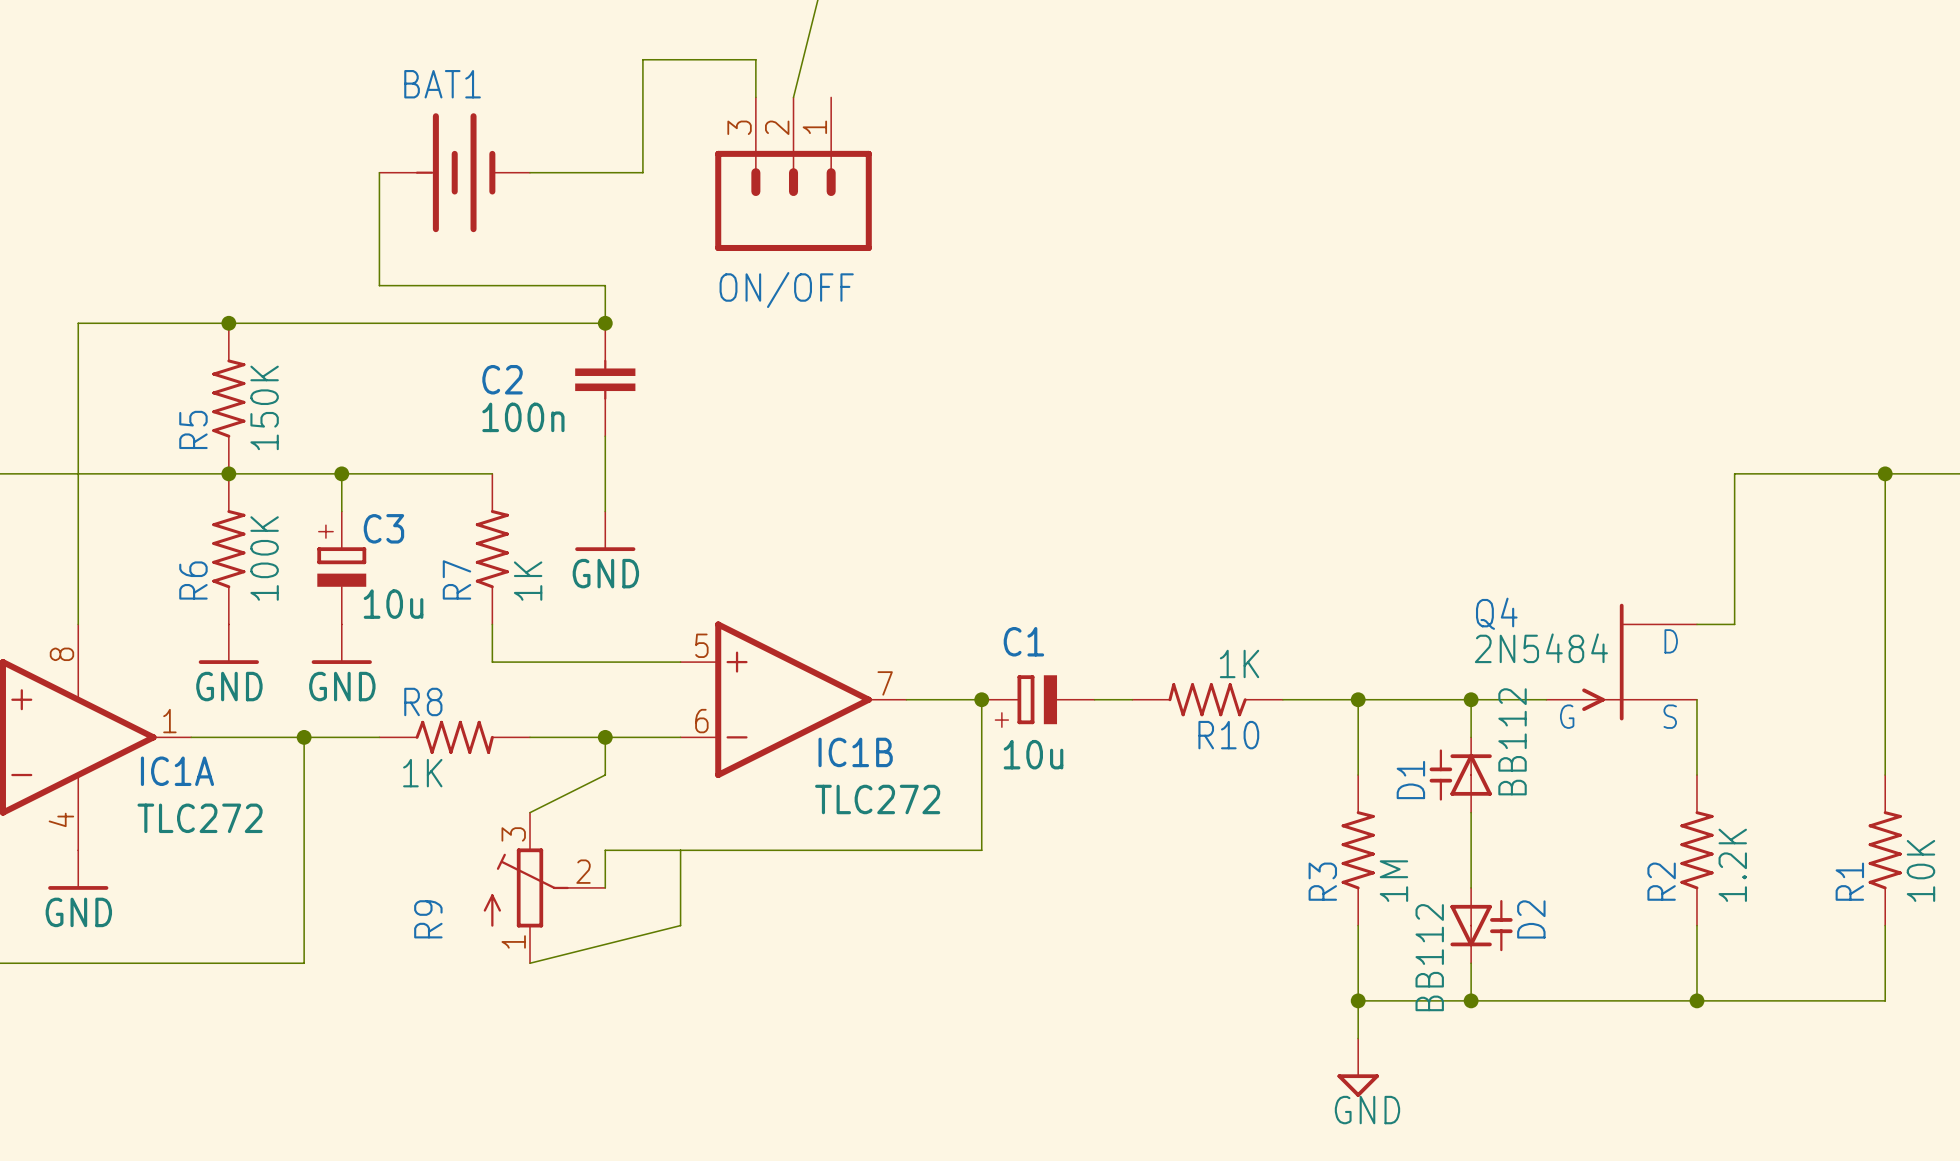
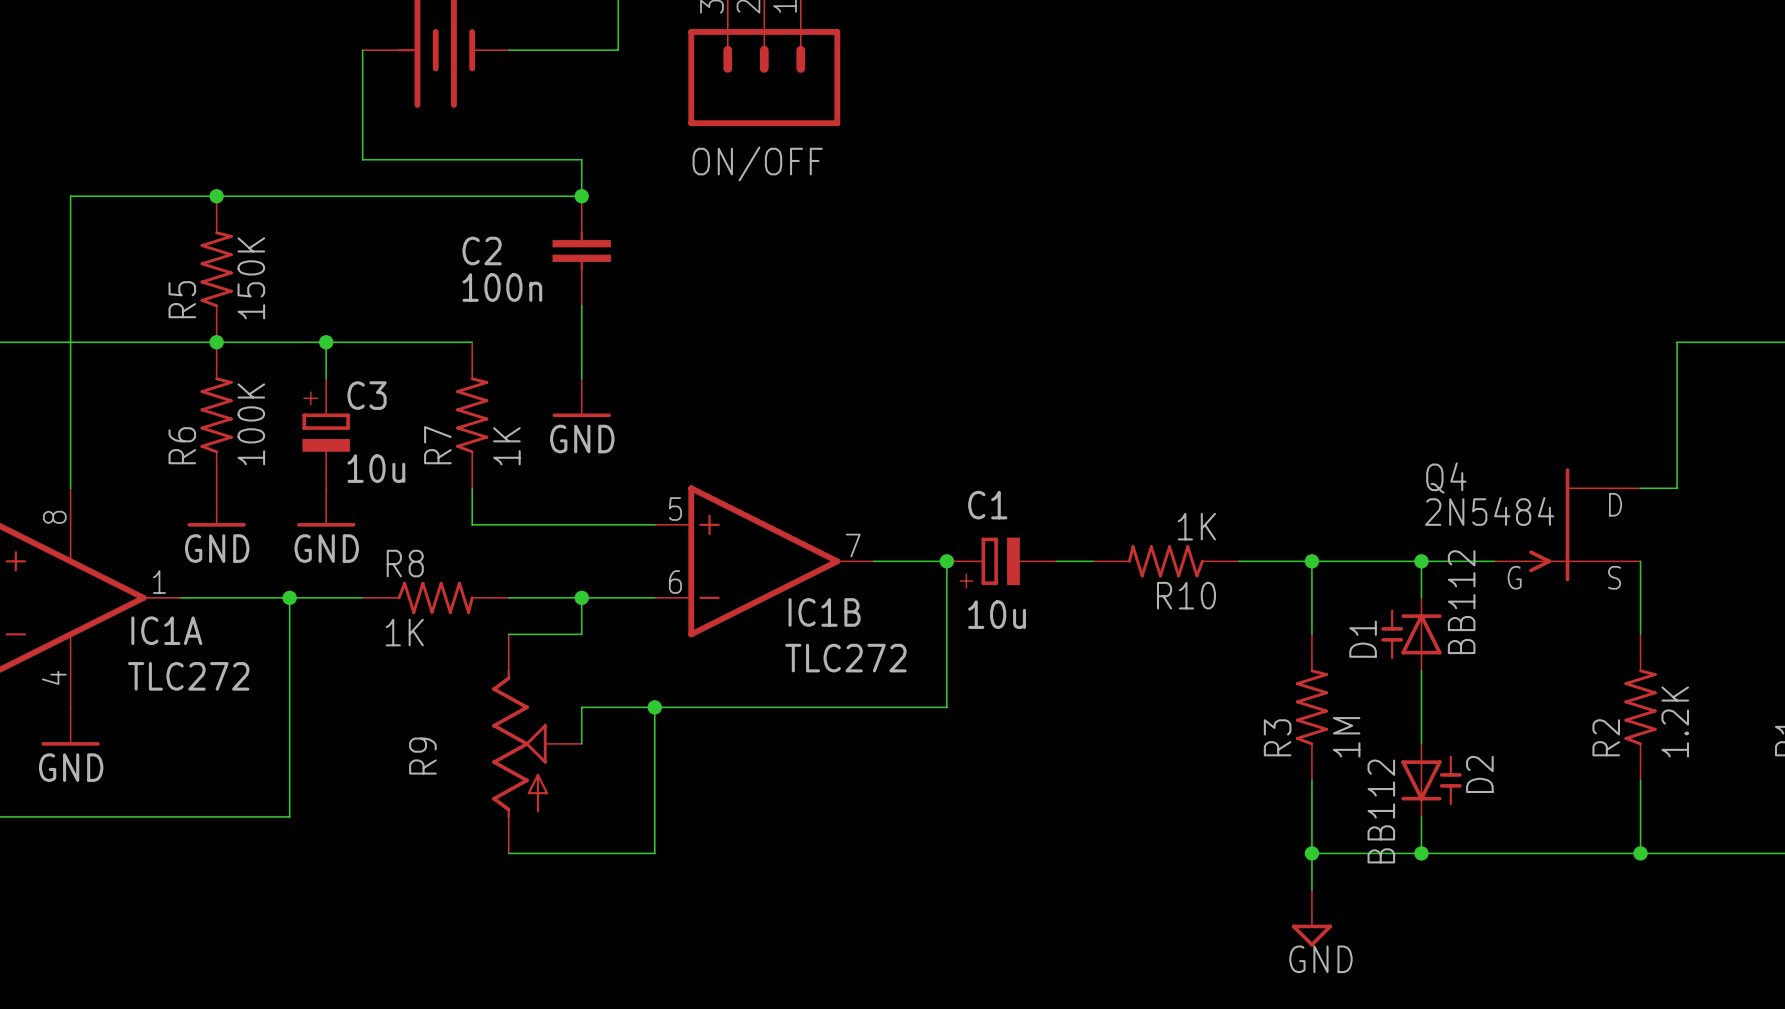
wire: (605, 775) (530, 812) -> (581, 634) (508, 634)
R9 symbol: [483, 812, 606, 964] -> [492, 634, 582, 854]
junction: none -> (654, 707)
wire: (680, 925) (530, 963) -> (654, 780) (654, 853) (508, 853)

